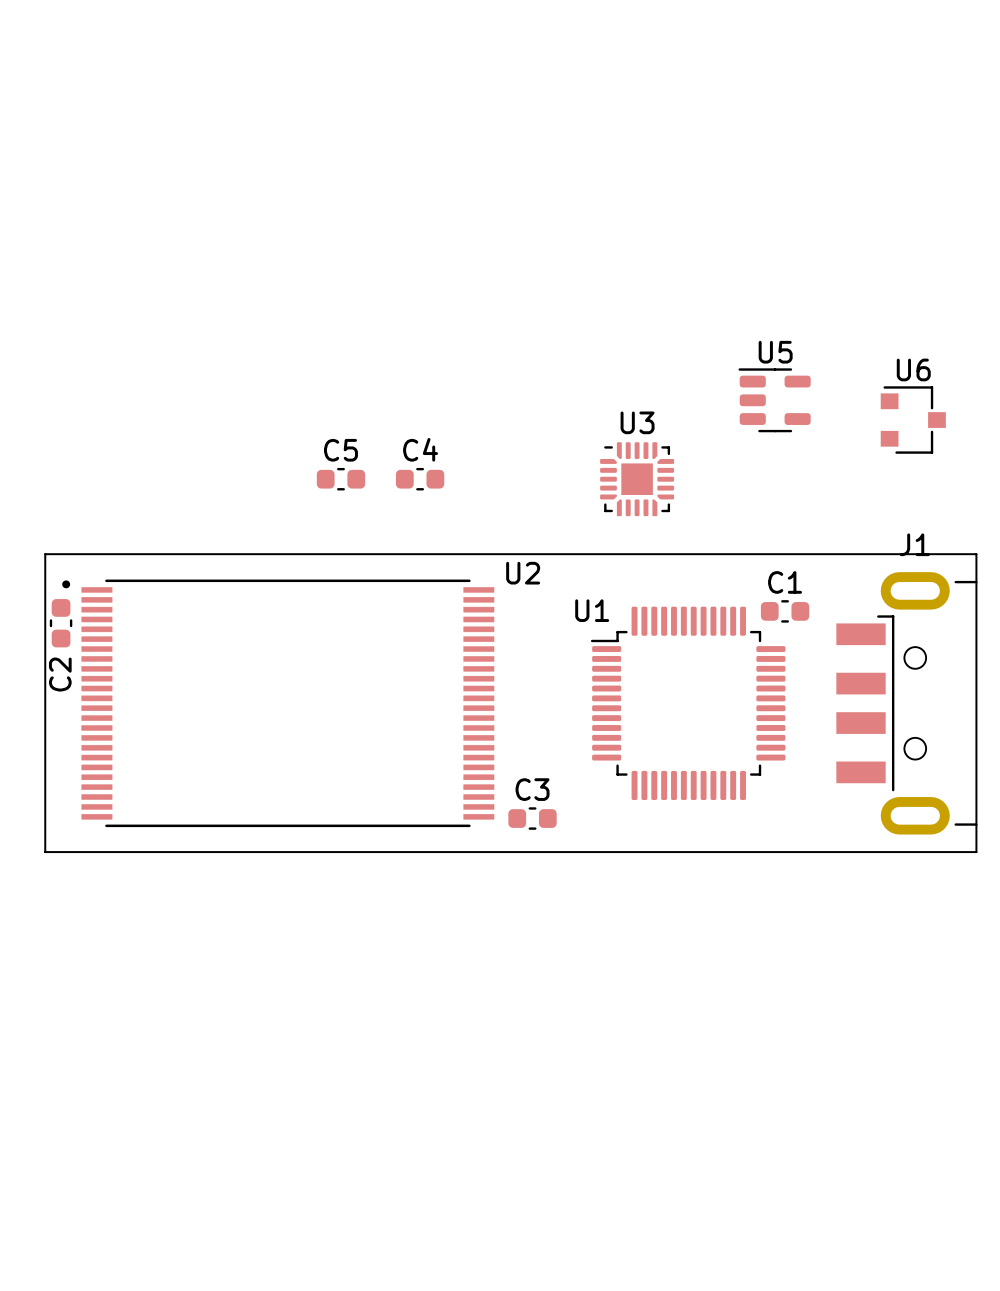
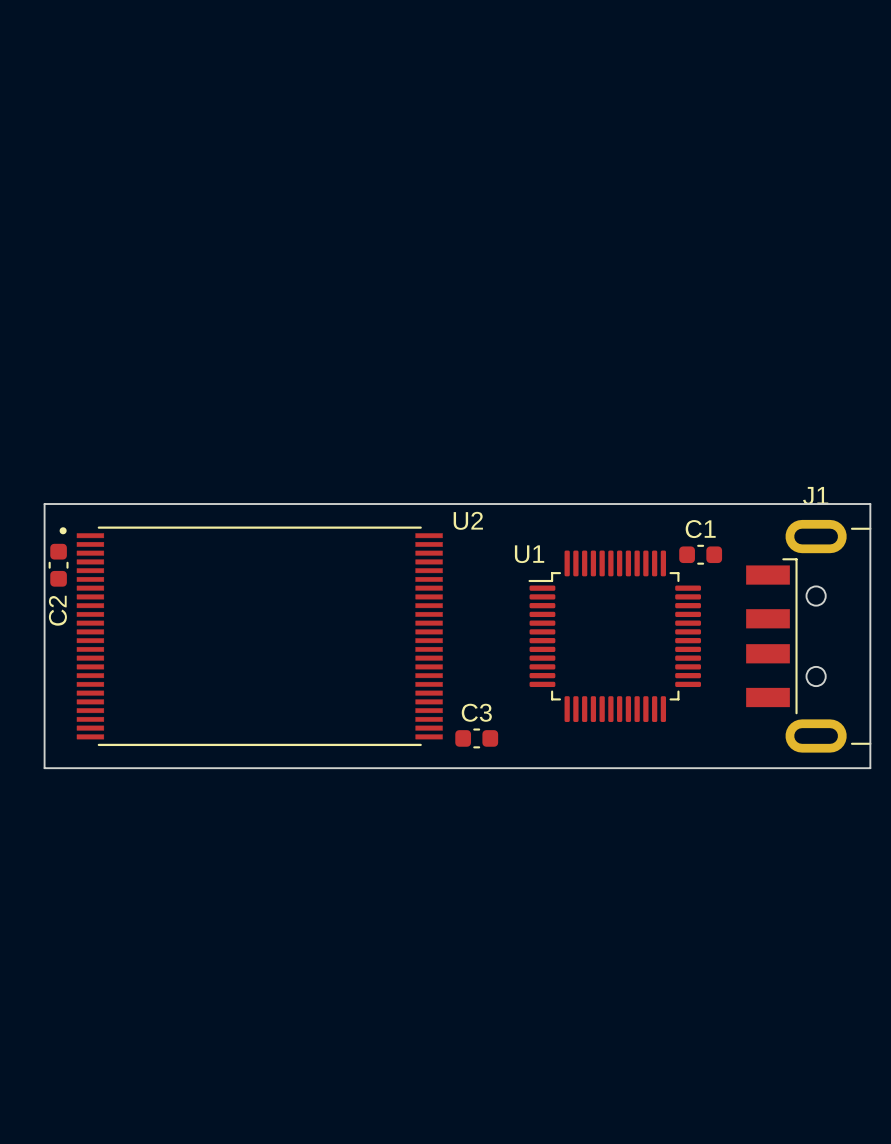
U5: (774, 400) -> none
U6: (913, 420) -> none
C5: (340, 479) -> none
C4: (420, 479) -> none
U3: (637, 479) -> none

